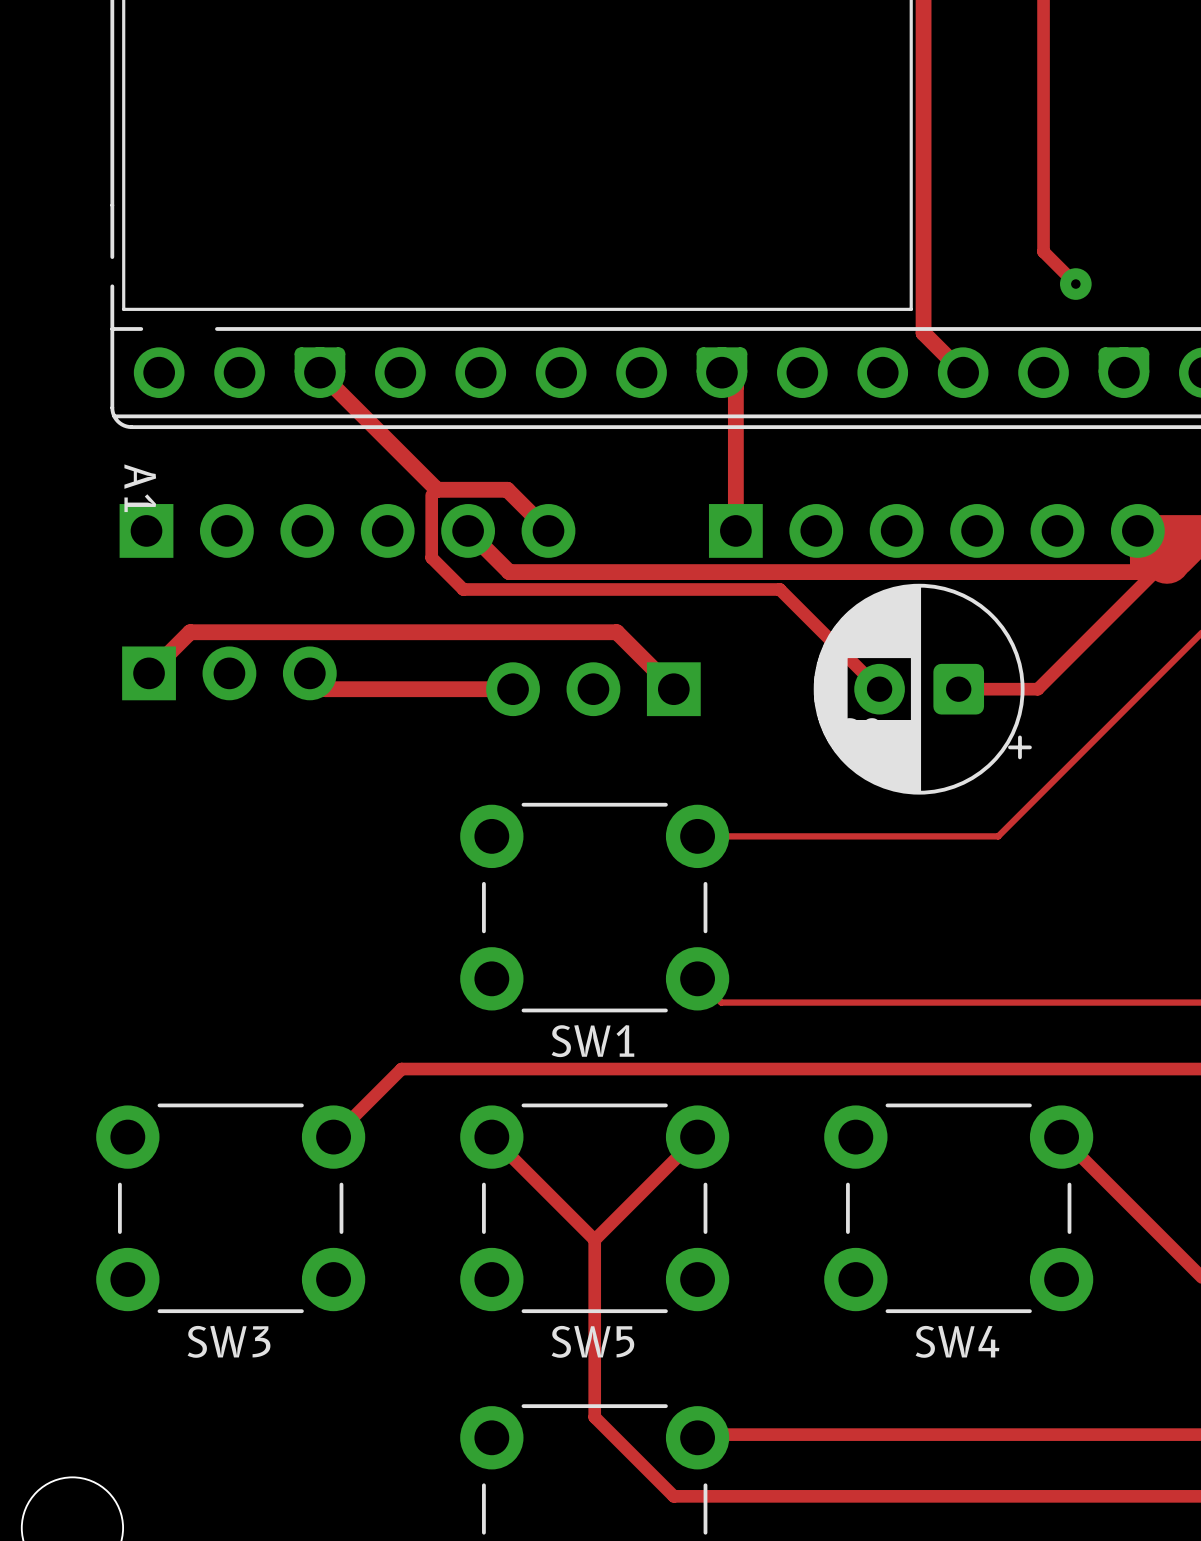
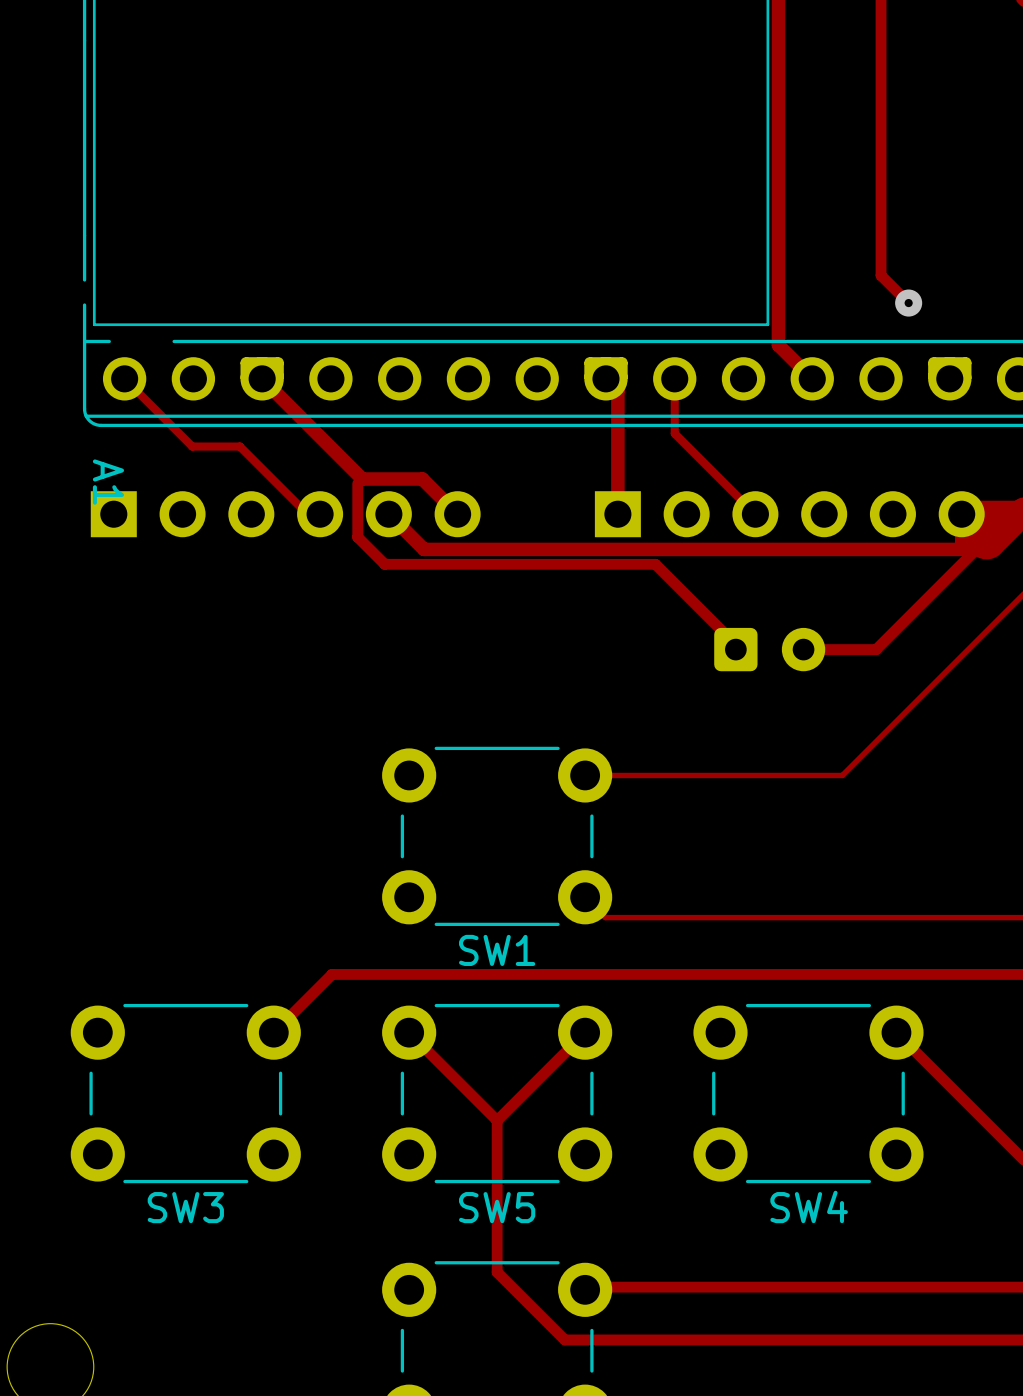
track: none -> (124, 378) (192, 446) (239, 446) (307, 514) (320, 514)
track: none -> (674, 378) (674, 433) (755, 514)
track: (149, 673) (190, 632) (616, 632) (673, 689) -> none
part: (229, 673) -> none
track: (309, 673) (325, 689) (513, 689) -> none
part: (593, 689) -> none
part side: top (922, 689) -> bottom (769, 649)

